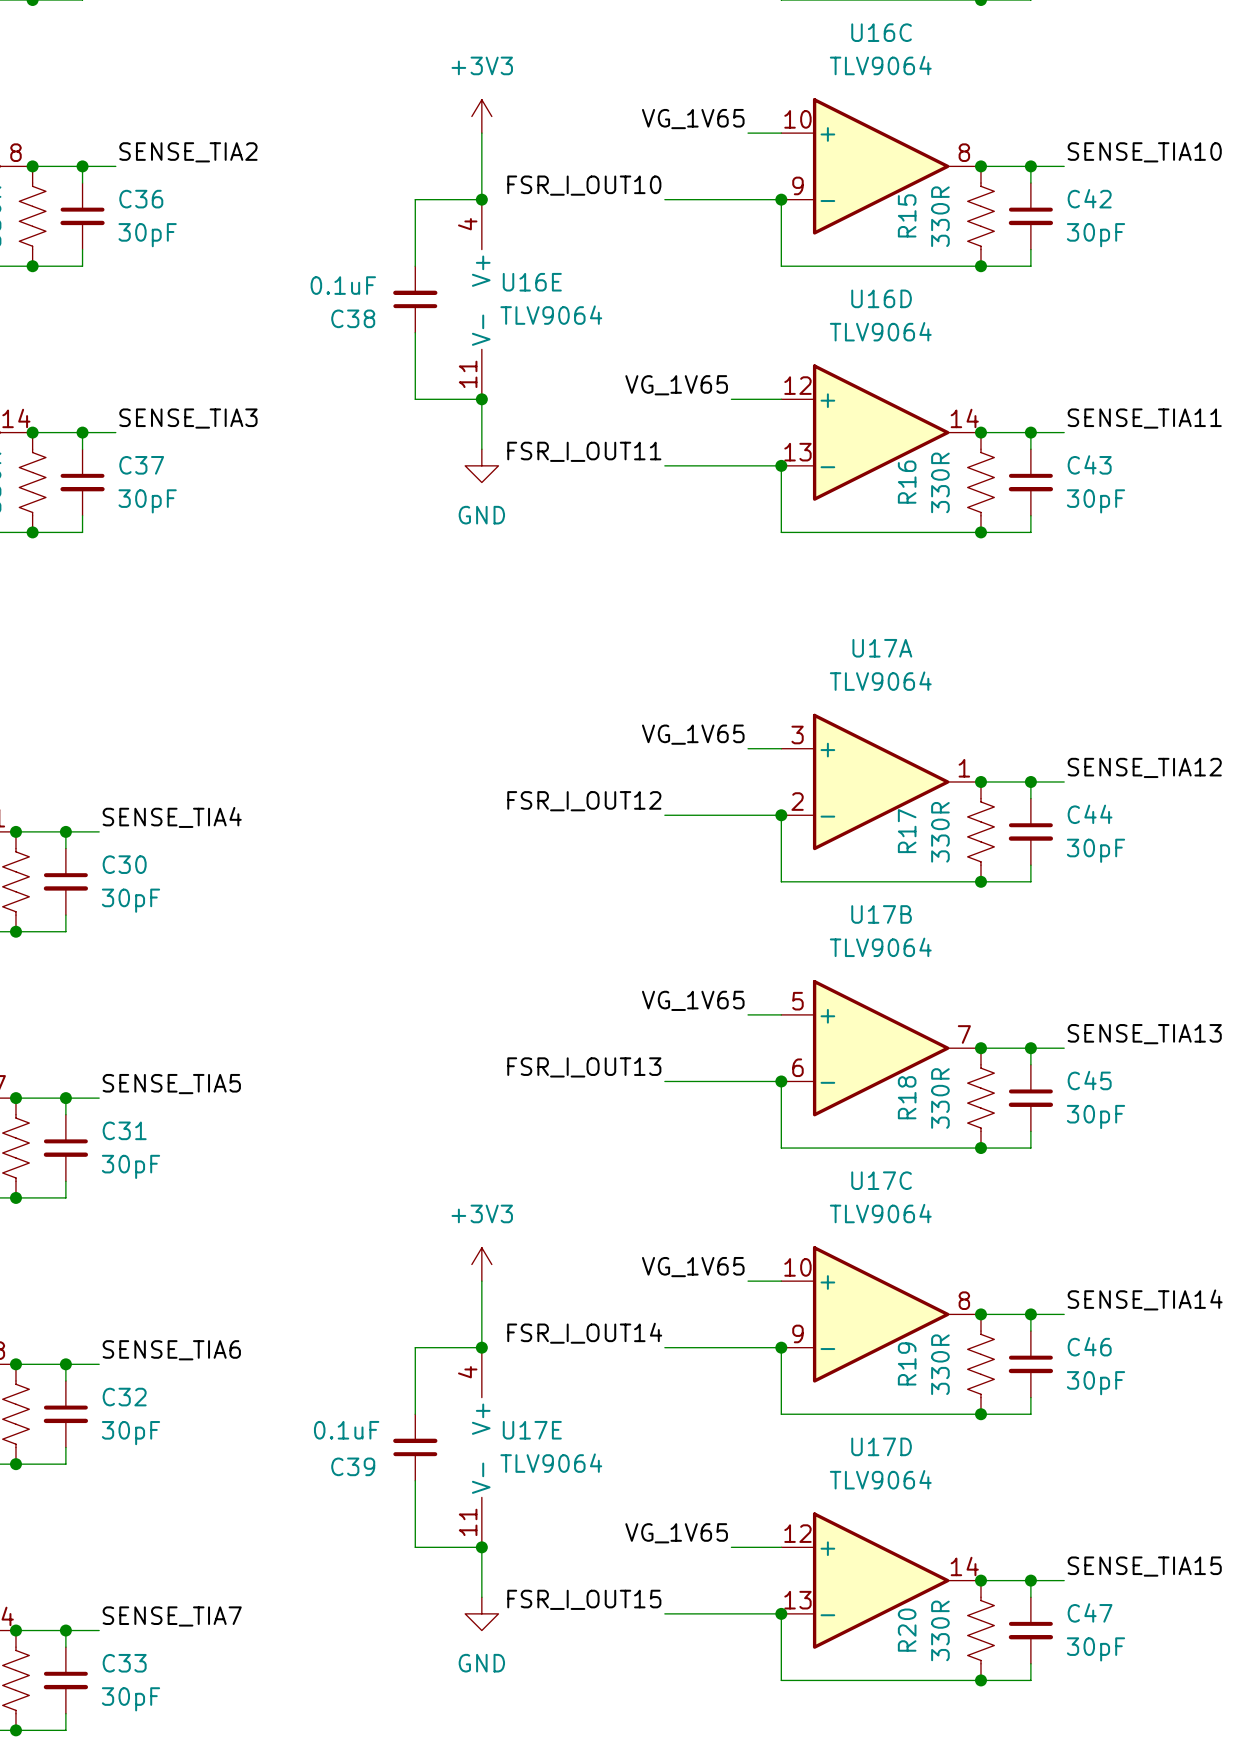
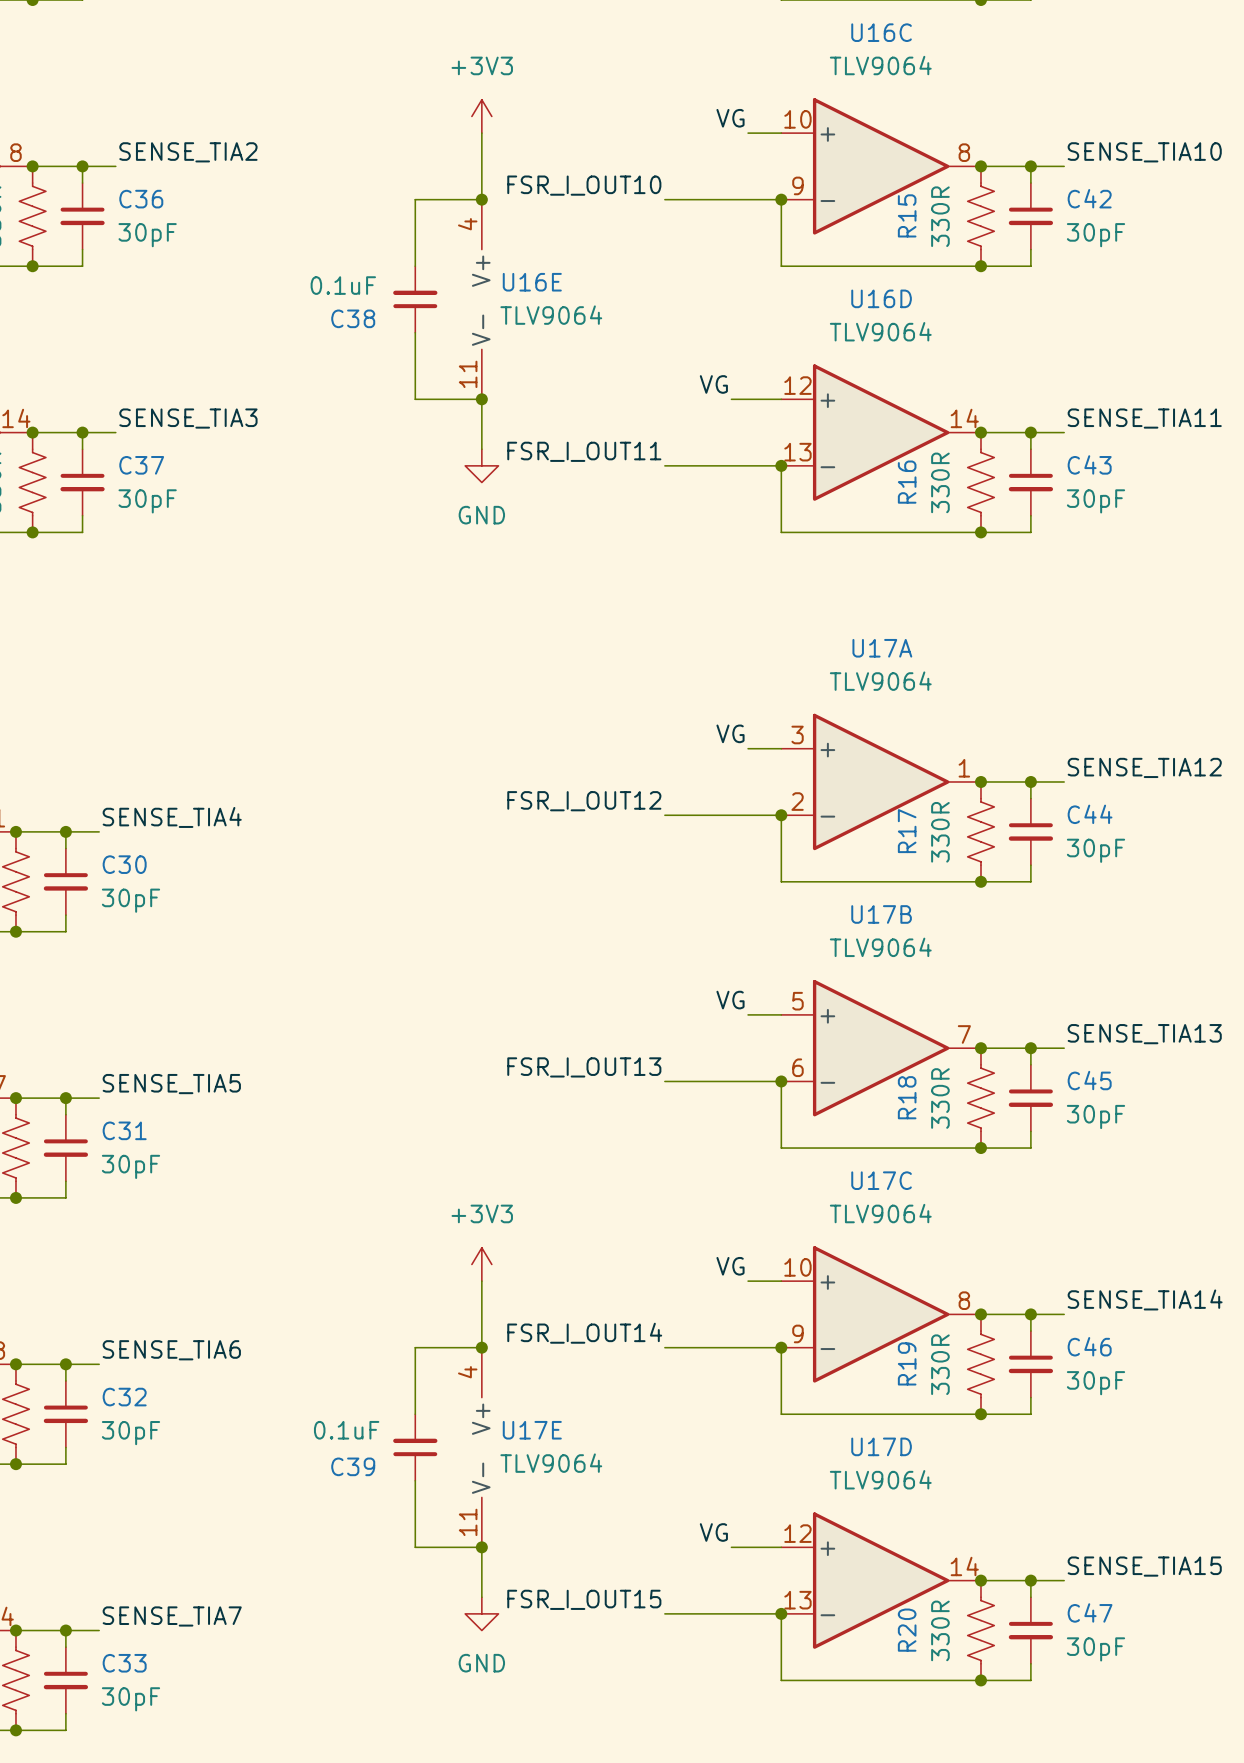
label: VG_1V65 (693, 119) -> VG (730, 118)
label: VG_1V65 (676, 385) -> VG (713, 384)
label: VG_1V65 (693, 734) -> VG (730, 733)
label: VG_1V65 (693, 1000) -> VG (730, 1000)
label: VG_1V65 (693, 1267) -> VG (730, 1266)
label: VG_1V65 (676, 1533) -> VG (713, 1532)

